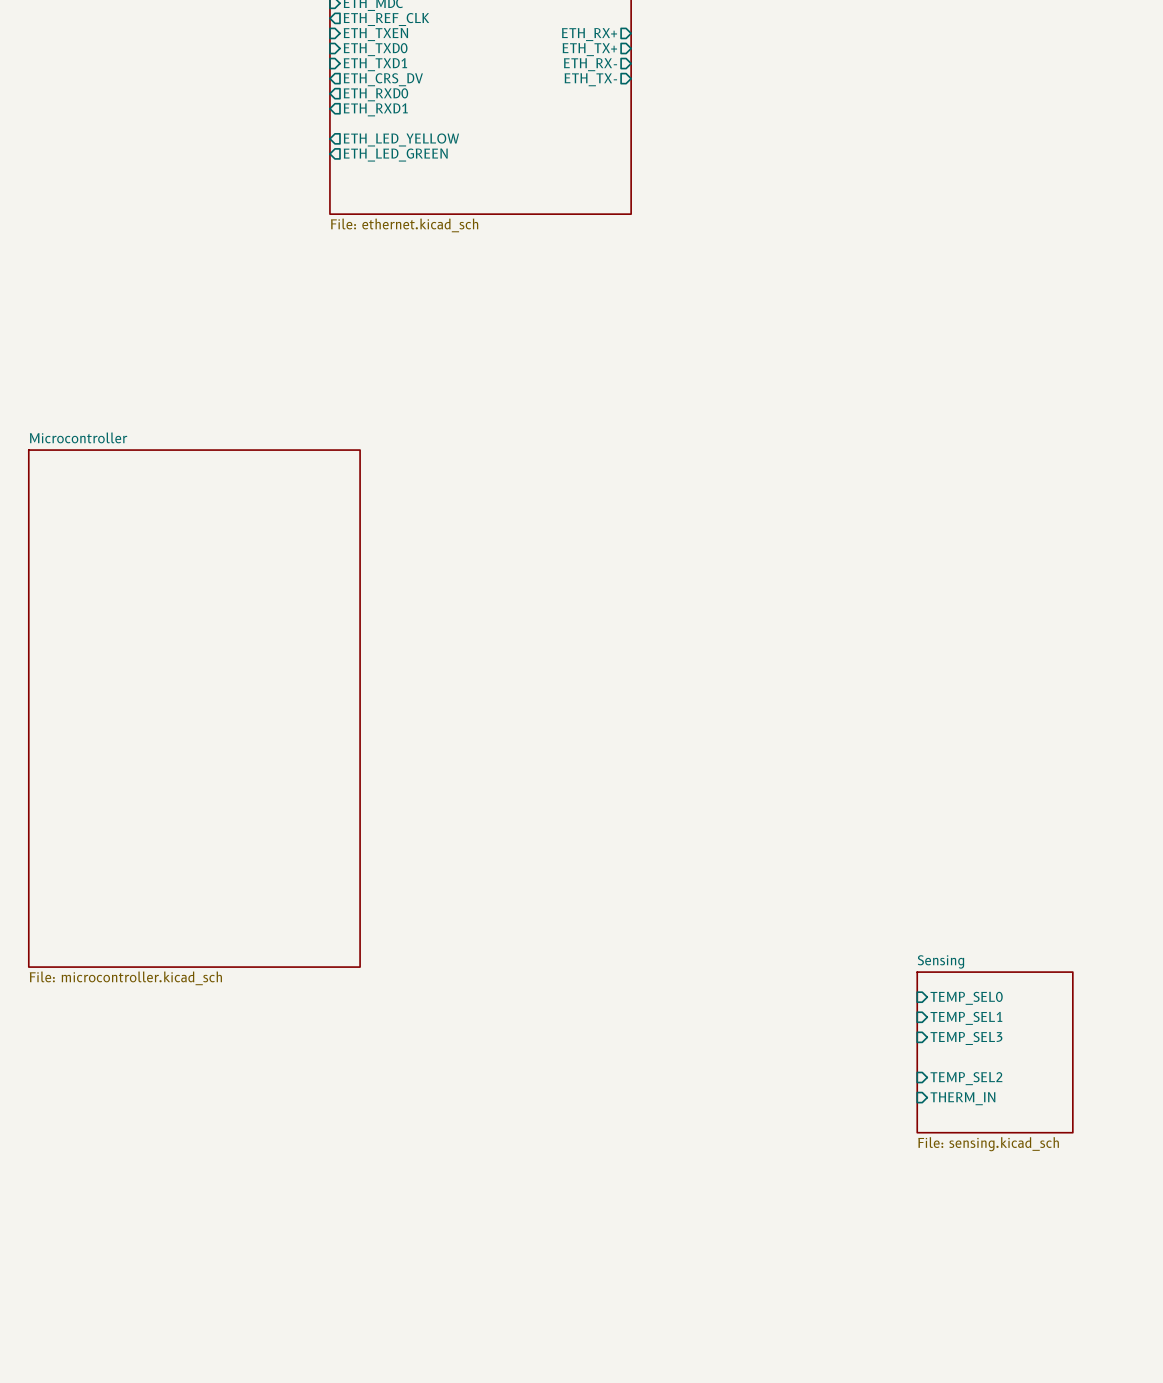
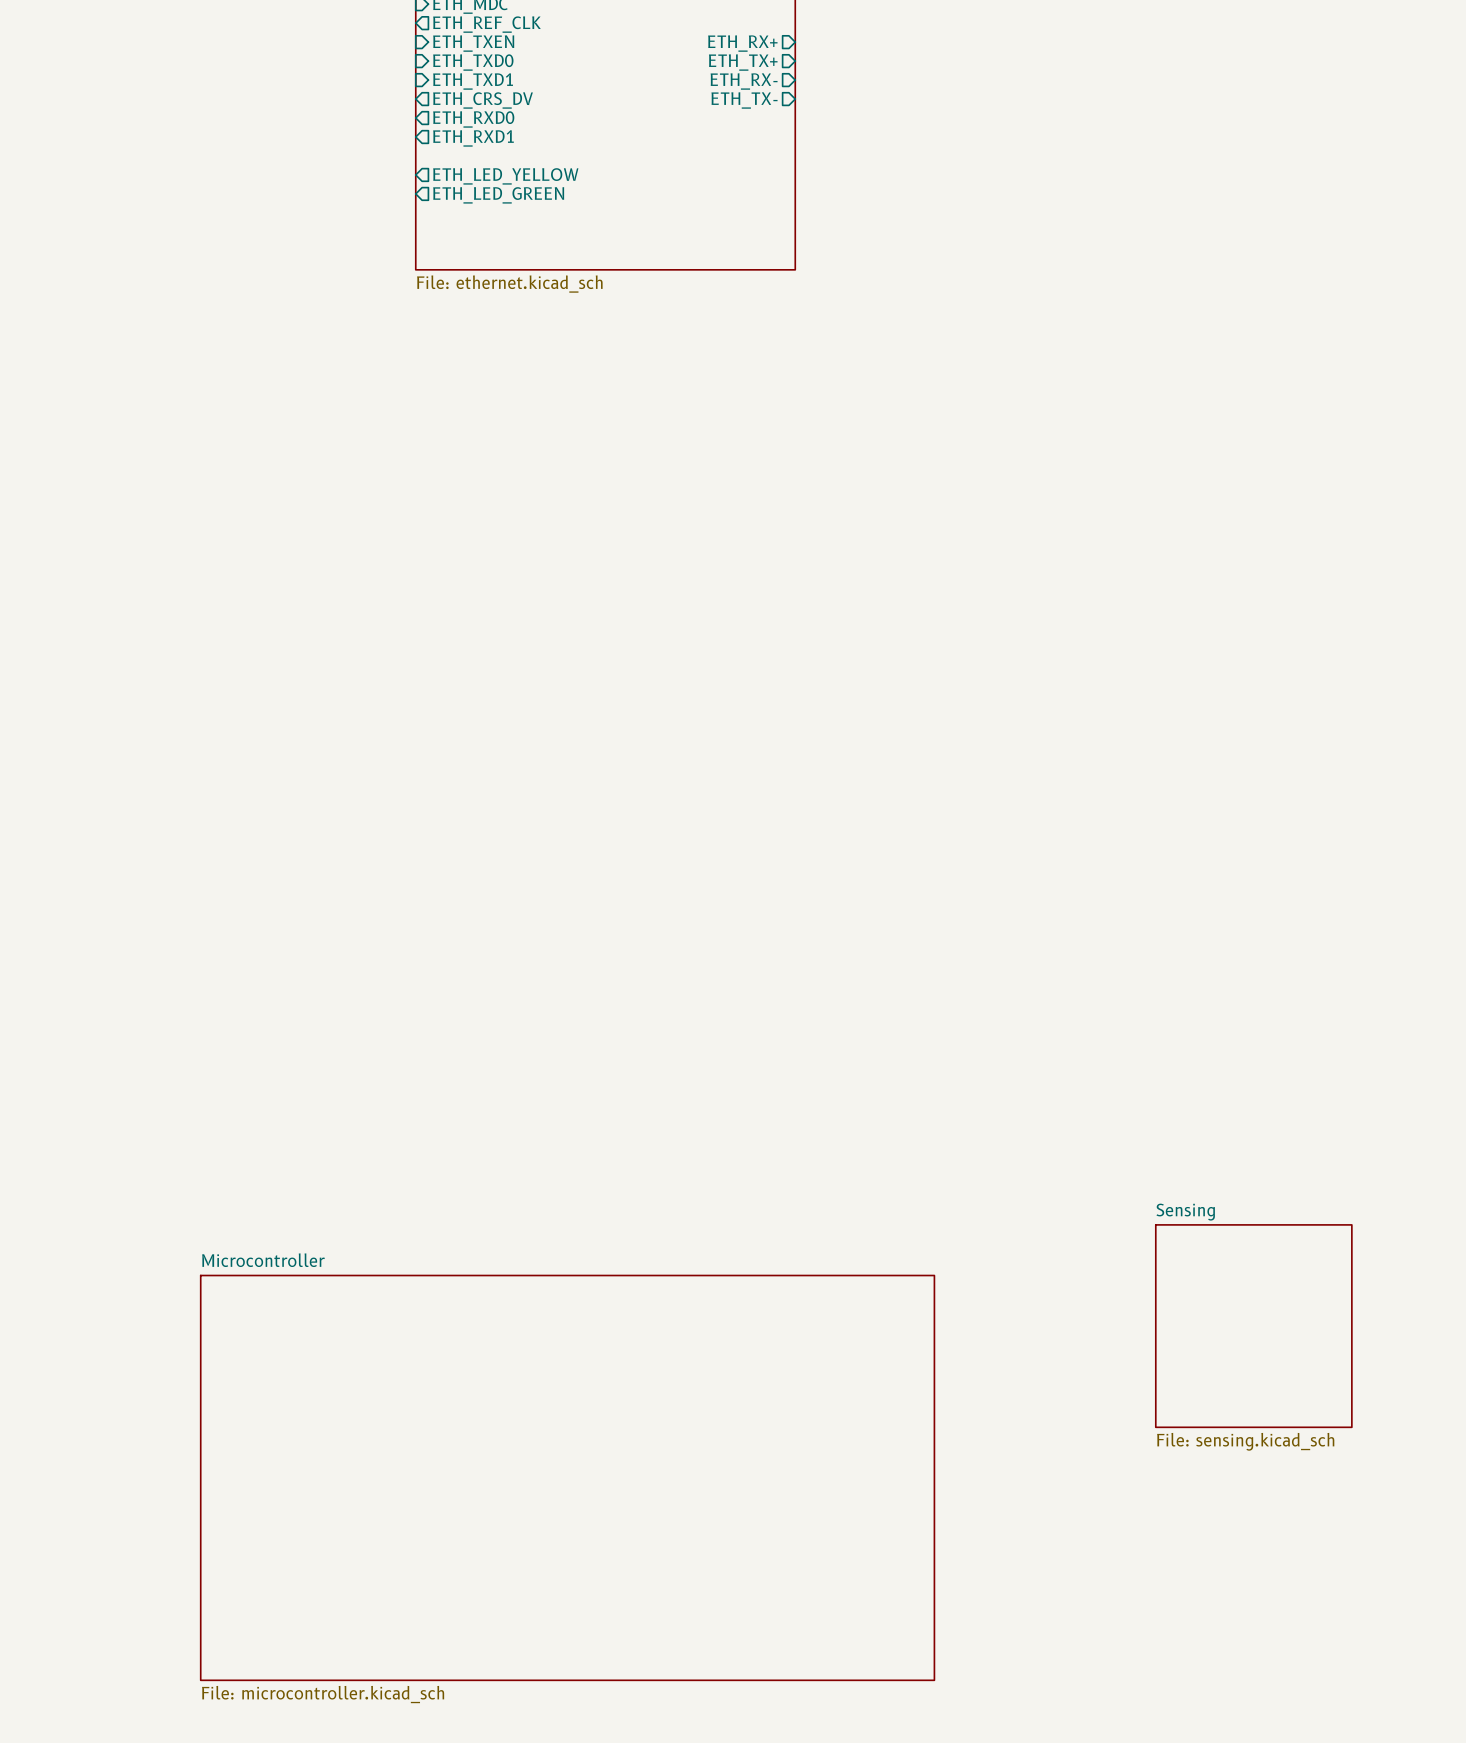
sheet Microcontroller: File: microcontroller.kicad_sch (194, 708) -> none
sheet pin: TEMP_SEL0 (966, 998) -> none
sheet pin: TEMP_SEL1 (966, 1018) -> none
sheet pin: TEMP_SEL3 (966, 1038) -> none
sheet pin: TEMP_SEL2 (966, 1078) -> none
sheet pin: THERM_IN (962, 1098) -> none
sheet Microcontroller: none -> File: microcontroller.kicad_sch (567, 1477)

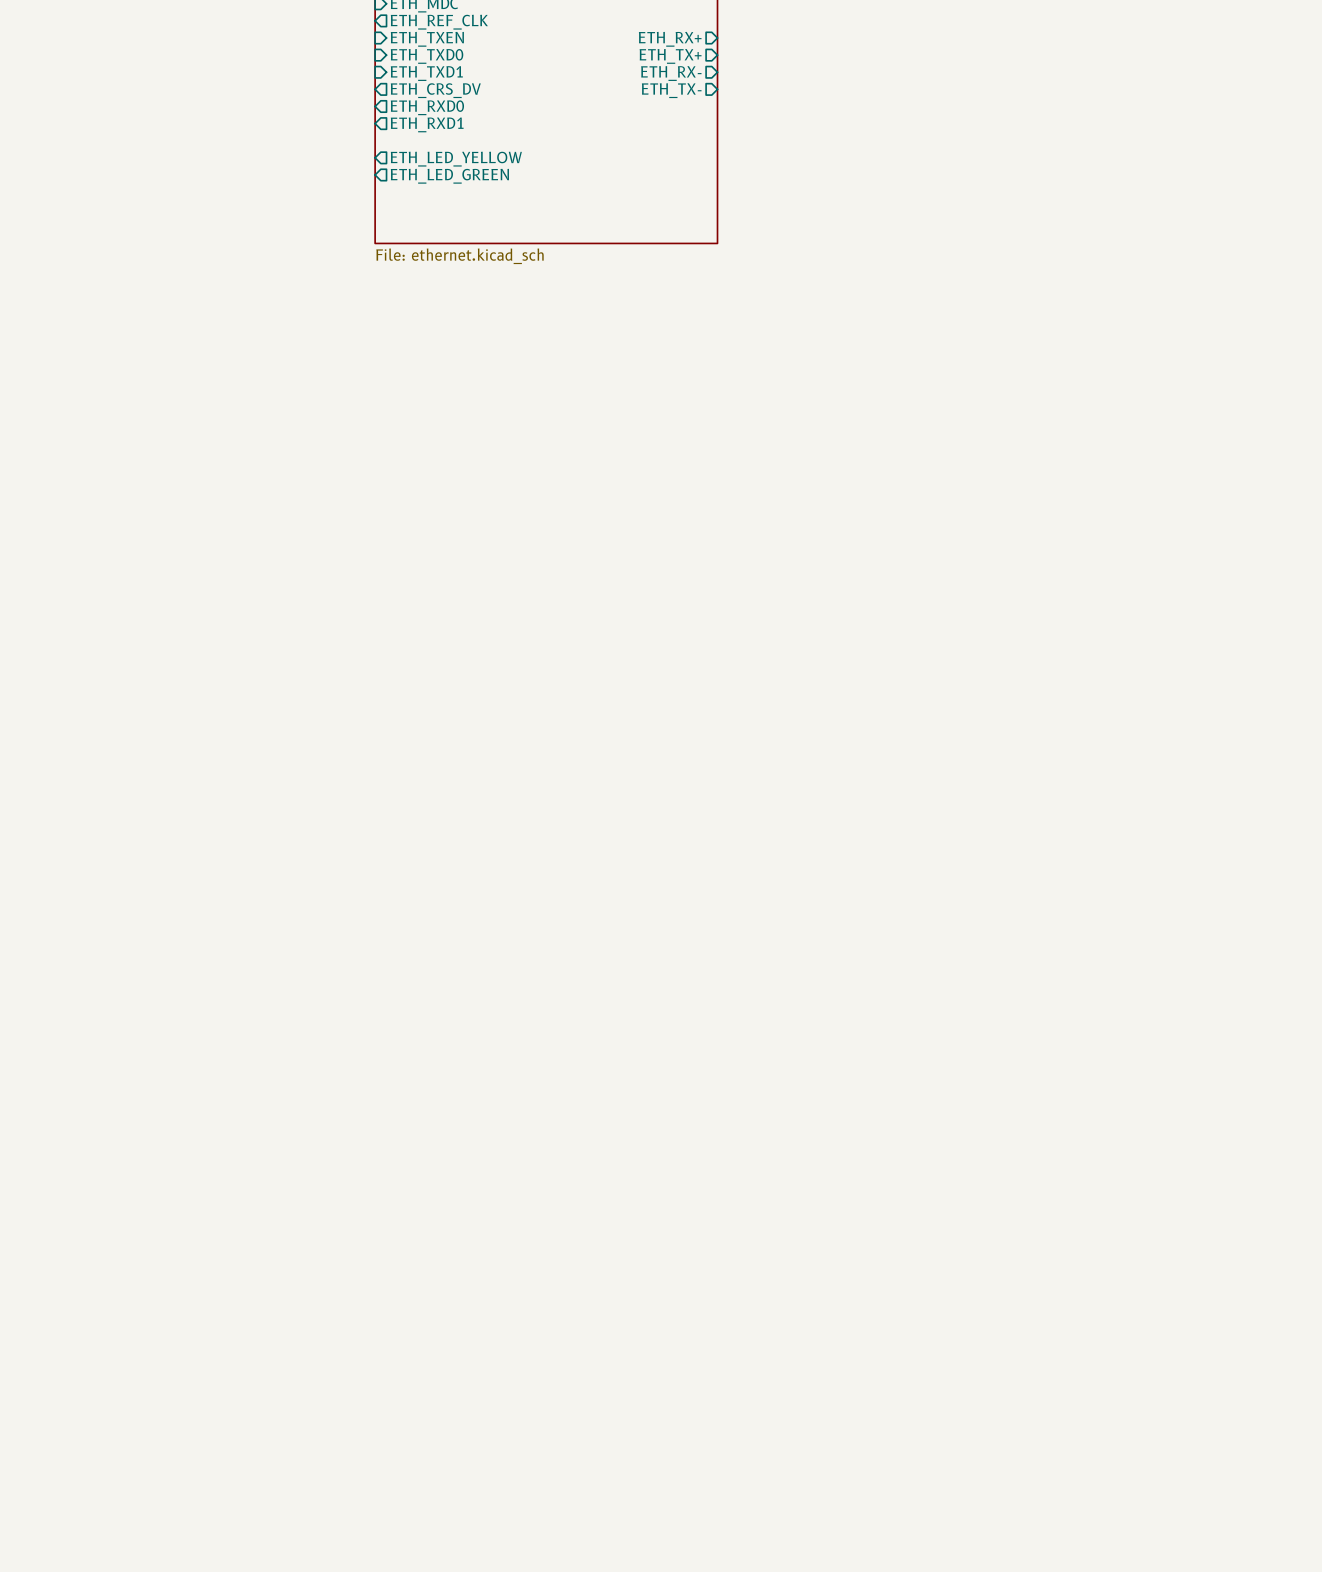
sheet Sensing: File: sensing.kicad_sch (1253, 1326) -> none
sheet Microcontroller: File: microcontroller.kicad_sch (567, 1477) -> none

